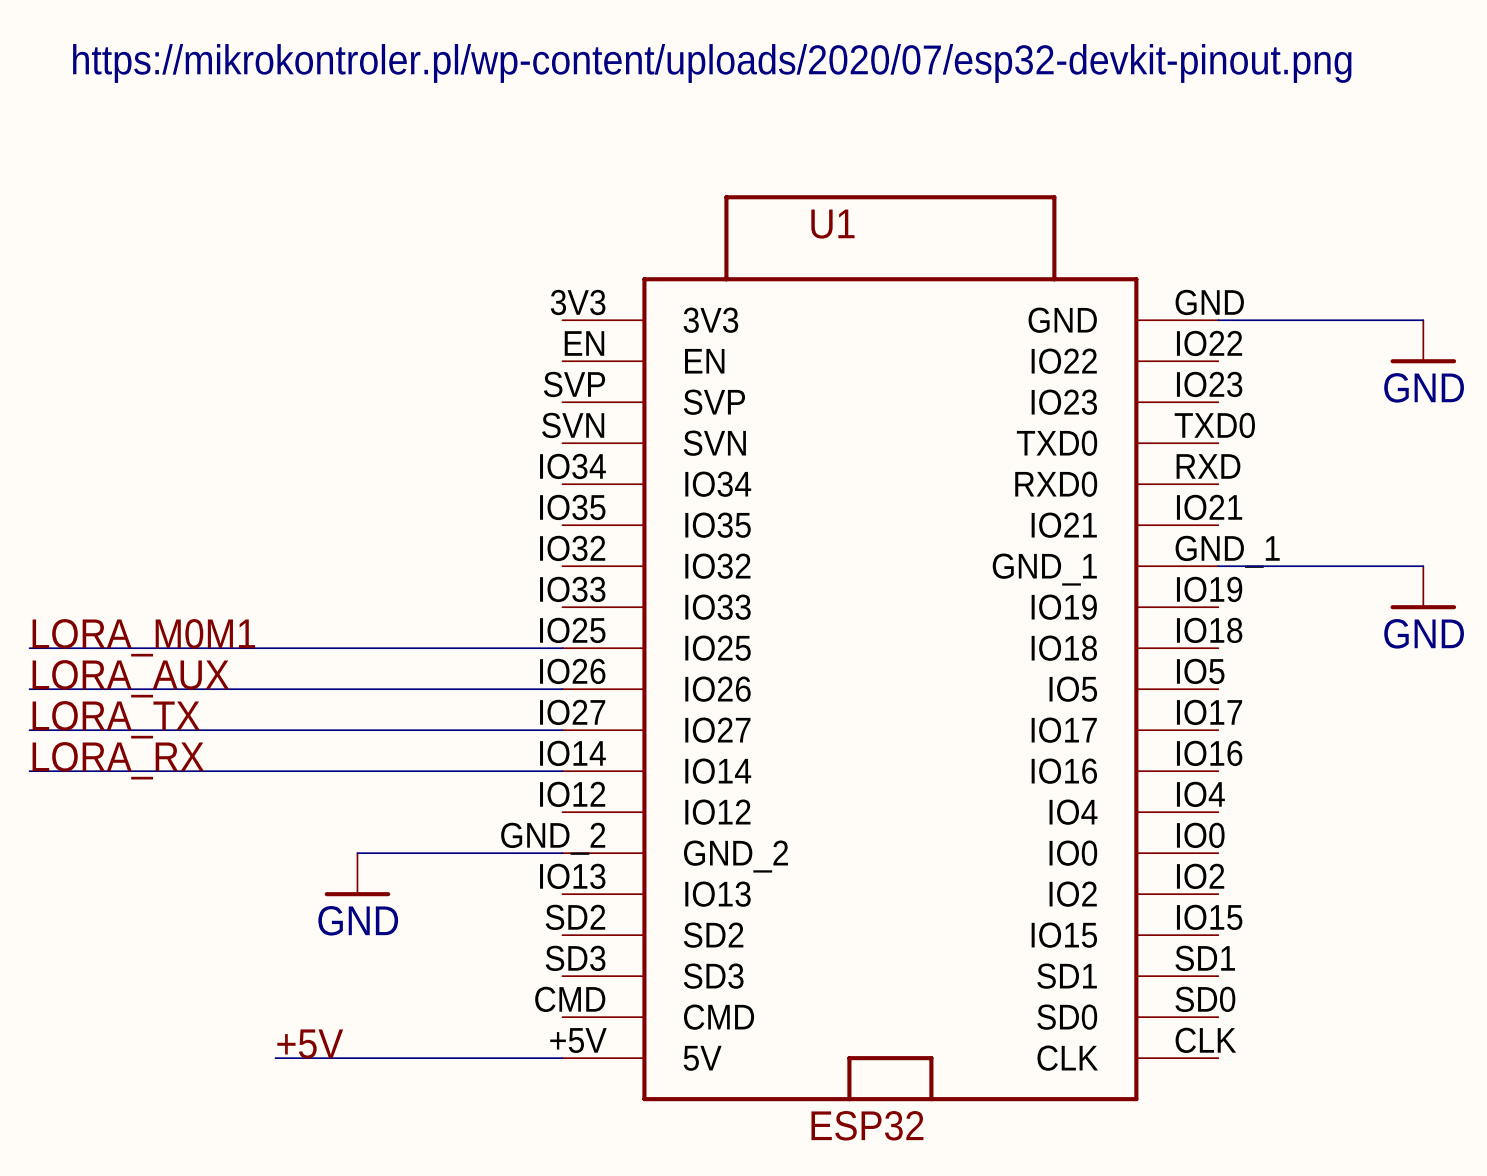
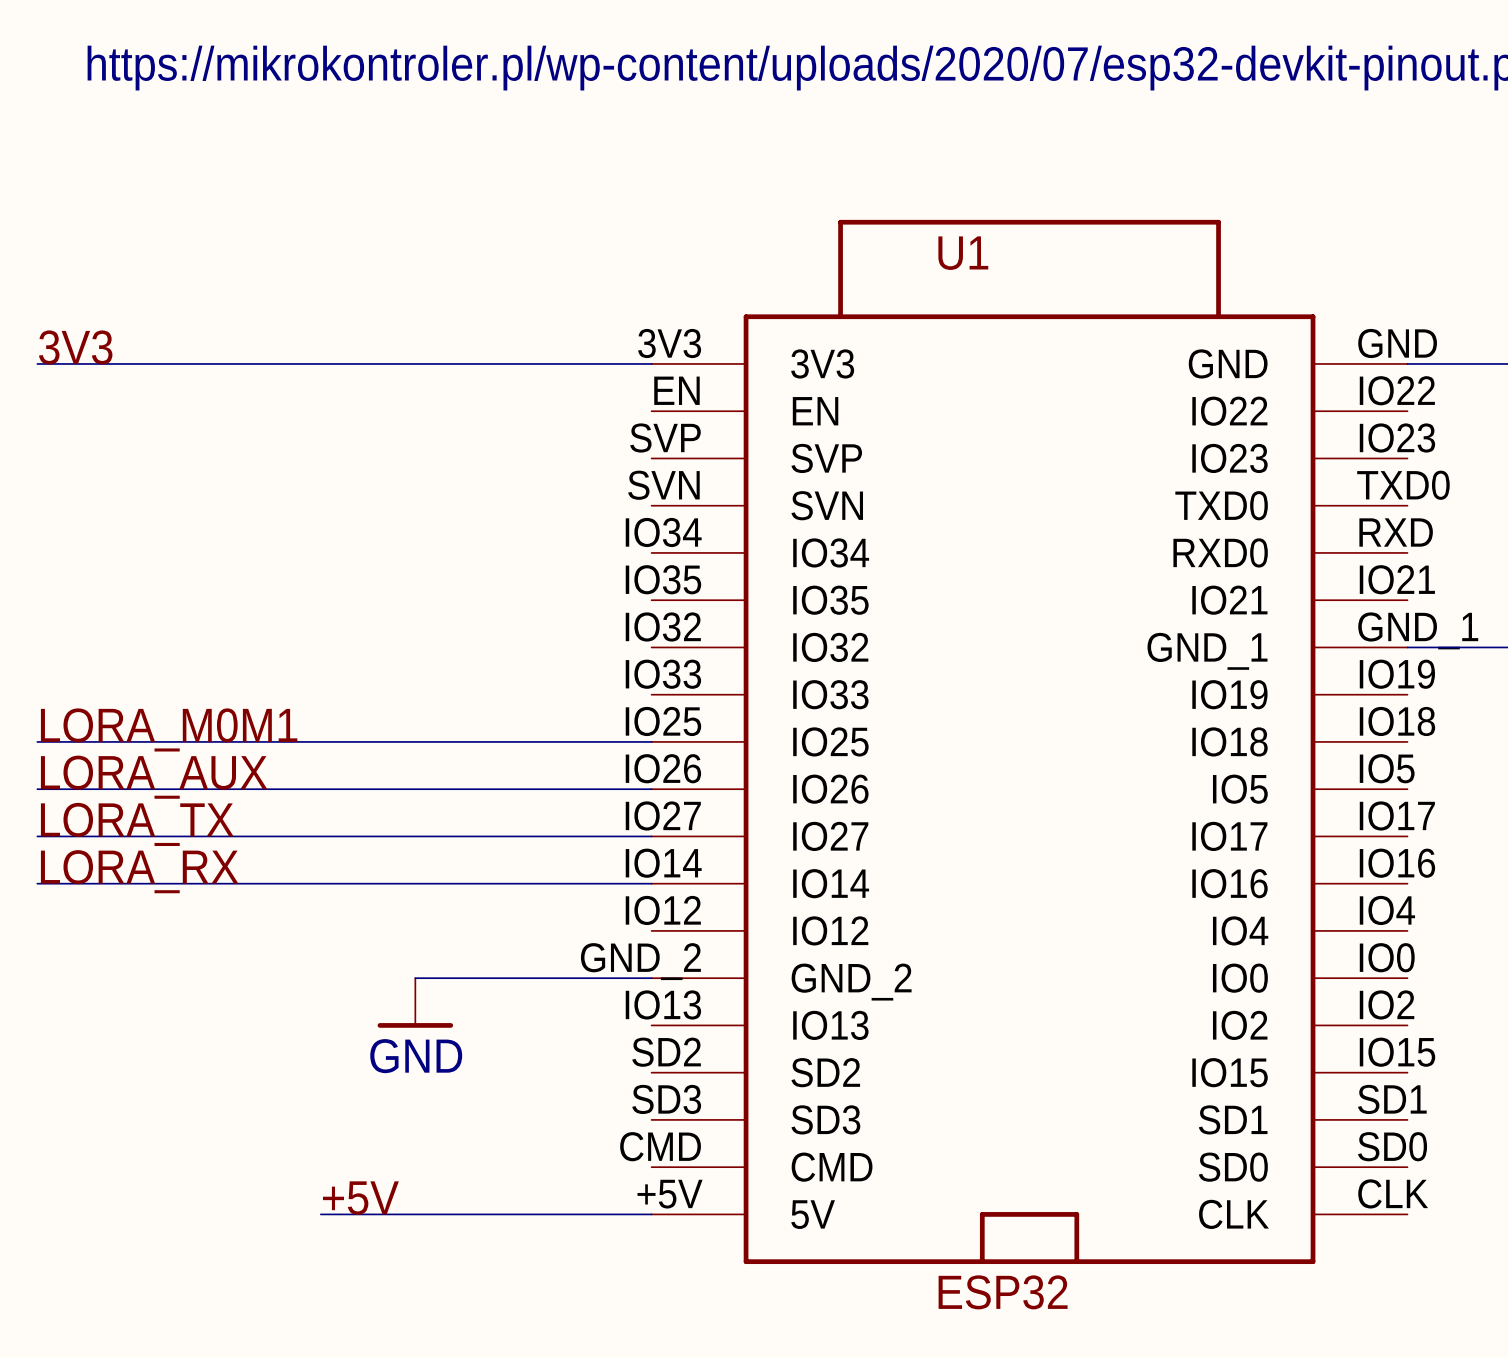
label: none -> 3V3 (75, 347)
wire: none -> (37, 363) (651, 363)

